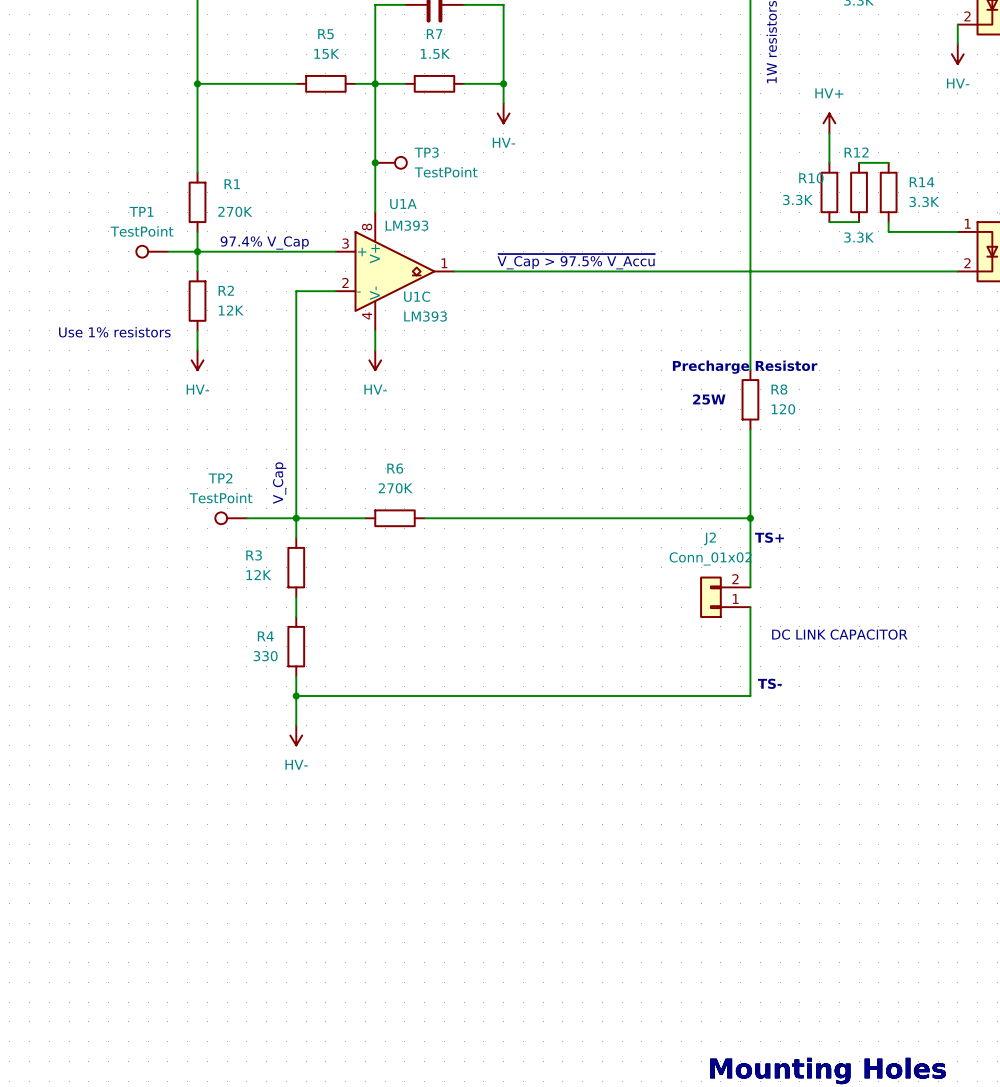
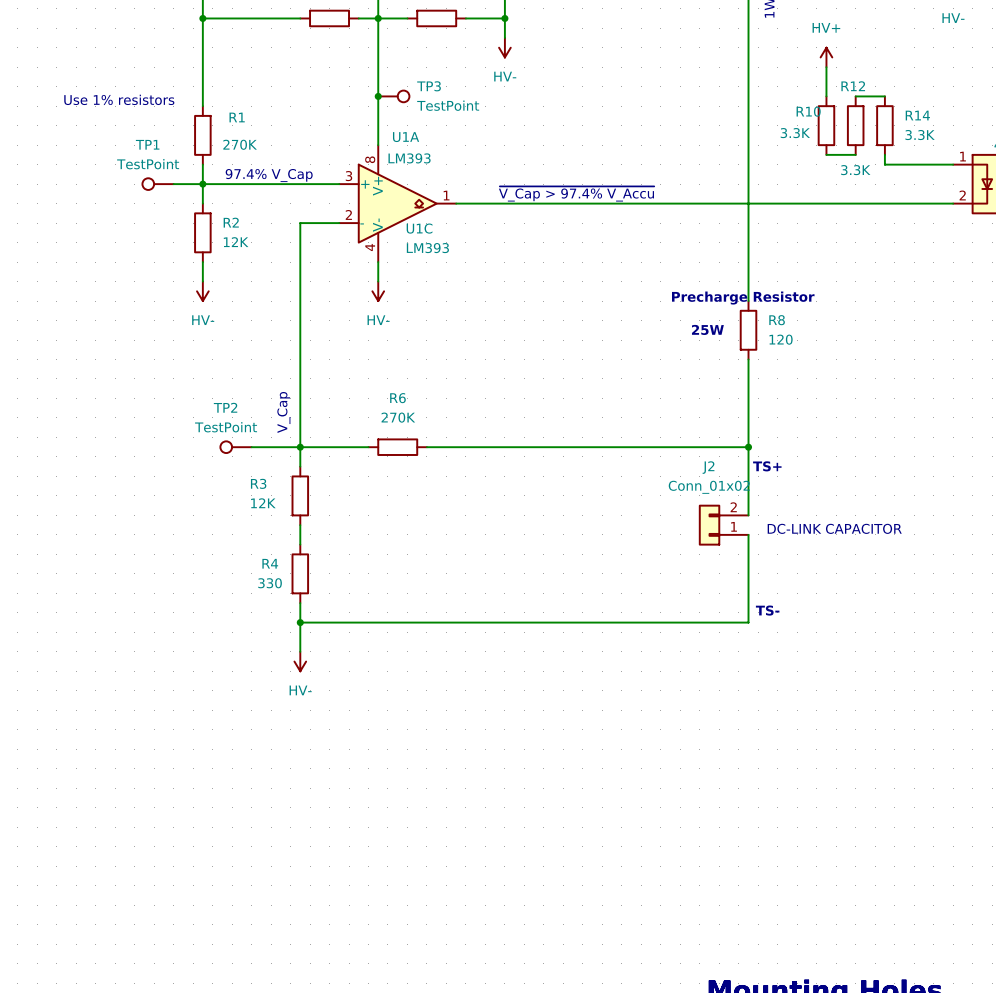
text: ~{V_Cap > 97.5% V_Accu} (576, 261) -> ~{V_Cap > 97.4% V_Accu} (576, 193)
text position: Use 1% resistors (114, 332) -> Use 1% resistors (119, 99)
text: none -> DC-LINK CAPACITOR (834, 528)
text: DC LINK CAPACITOR (839, 634) -> none

